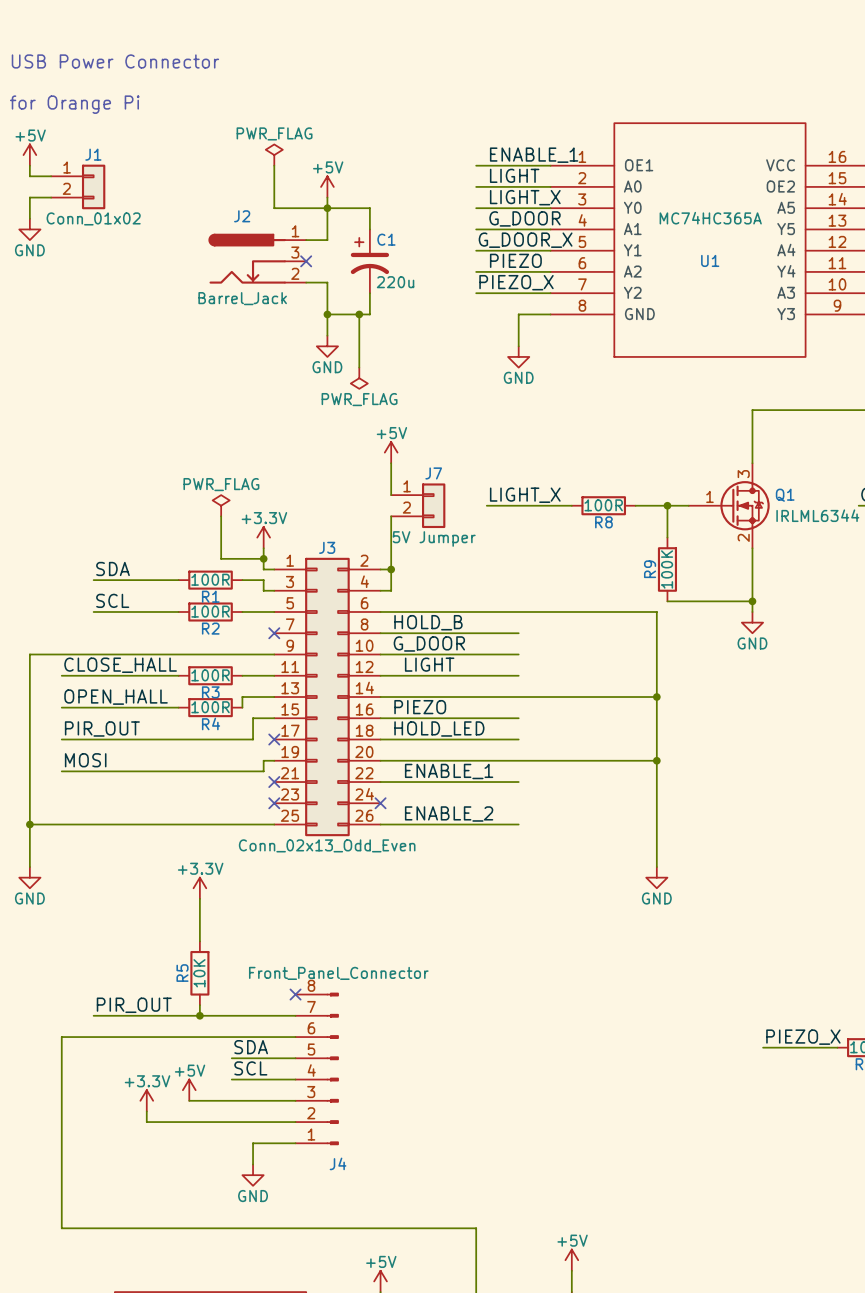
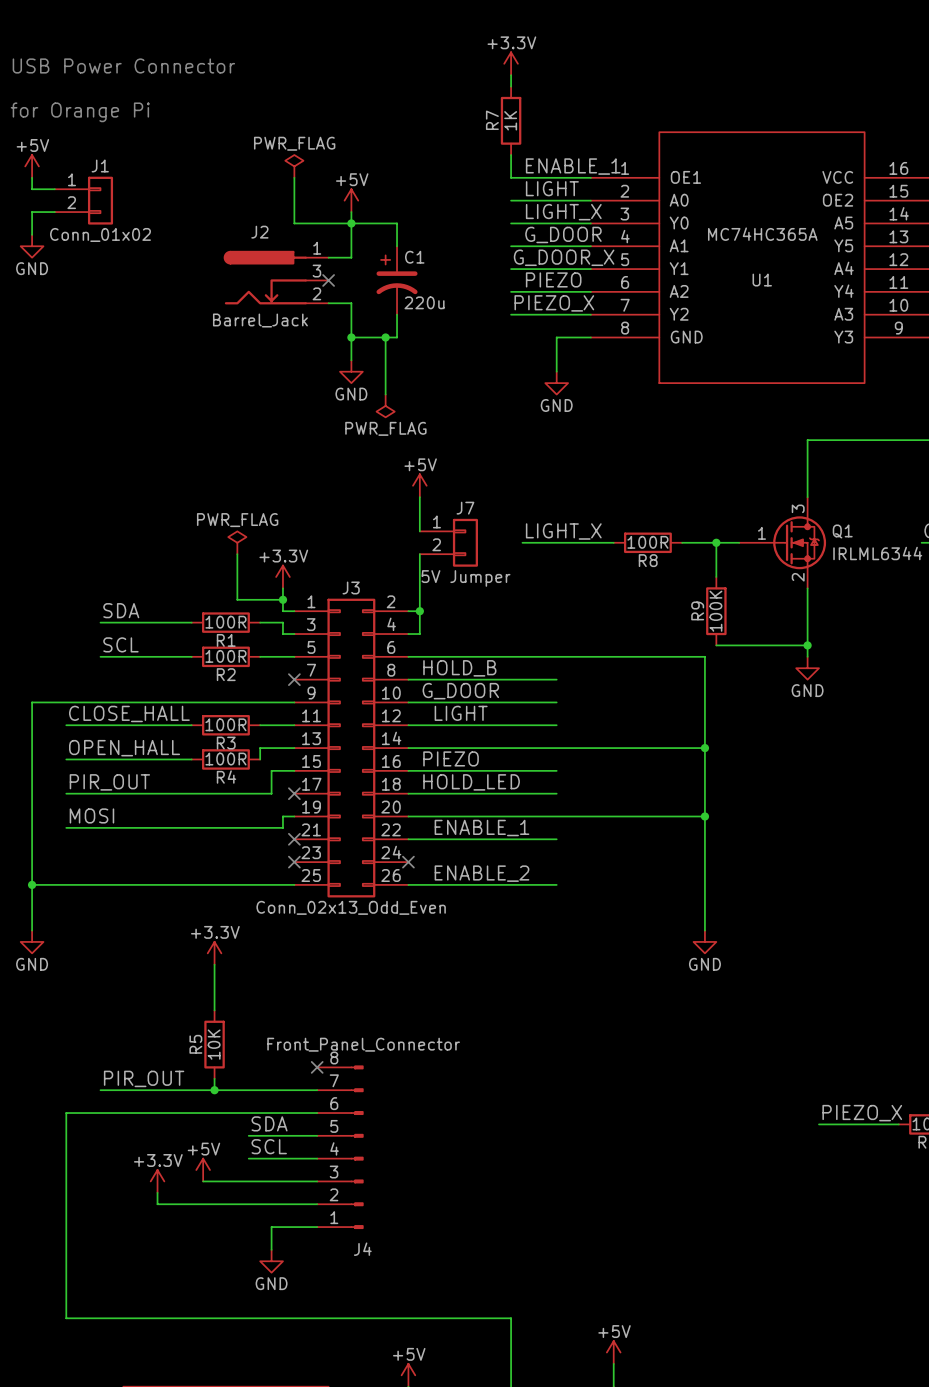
power symbol: none -> +3.3V (511, 63)
wire: none -> (511, 75) (511, 86)
R7: none -> 1K (511, 120)
wire: none -> (511, 155) (511, 177)

